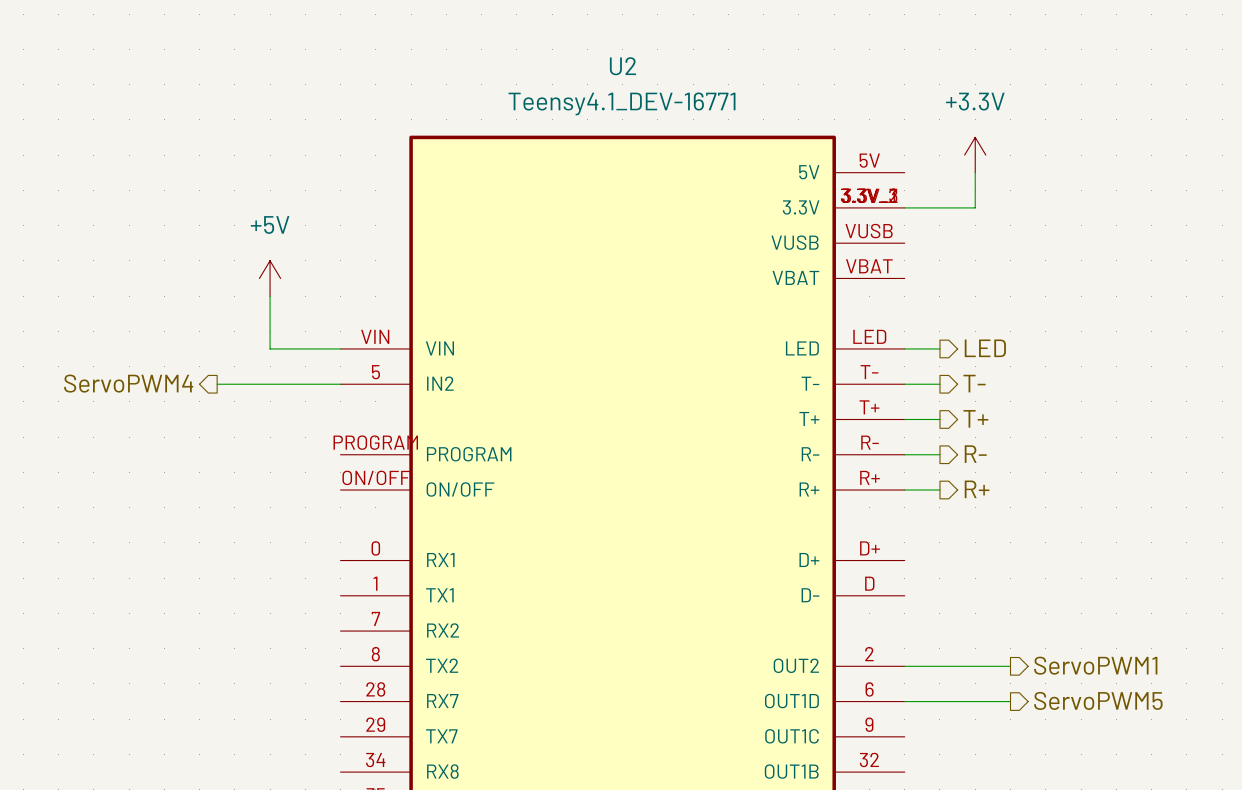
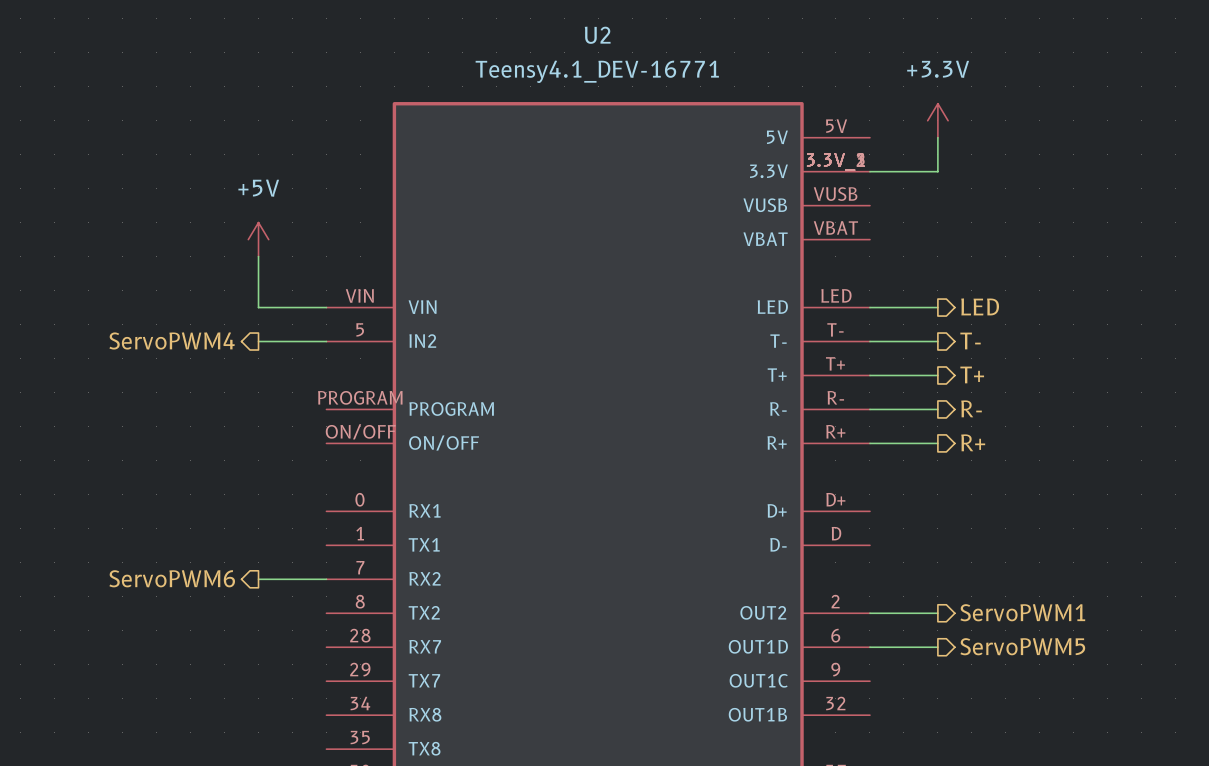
wire: none -> (903, 307) (937, 307)
hierarchical label position: LED (985, 348) -> LED (980, 306)
hierarchical label position: ServoPWM4 (128, 383) -> ServoPWM4 (172, 340)
hierarchical label position: T- (974, 383) -> T- (970, 340)
wire: (217, 384) (270, 384) -> none
wire: none -> (903, 341) (937, 341)
hierarchical label position: T+ (975, 418) -> T+ (972, 374)
wire: none -> (903, 375) (937, 375)
hierarchical label position: R- (975, 454) -> R- (971, 408)
hierarchical label position: R+ (977, 489) -> R+ (973, 442)
hierarchical label: none -> ServoPWM6 (172, 578)
wire: none -> (258, 579) (326, 579)
hierarchical label position: ServoPWM1 (1095, 665) -> ServoPWM1 (1022, 612)
wire: (975, 666) (1010, 666) -> (903, 409) (937, 409)
hierarchical label position: ServoPWM5 (1098, 700) -> ServoPWM5 (1022, 646)
wire: (975, 701) (1010, 701) -> (903, 443) (937, 443)

